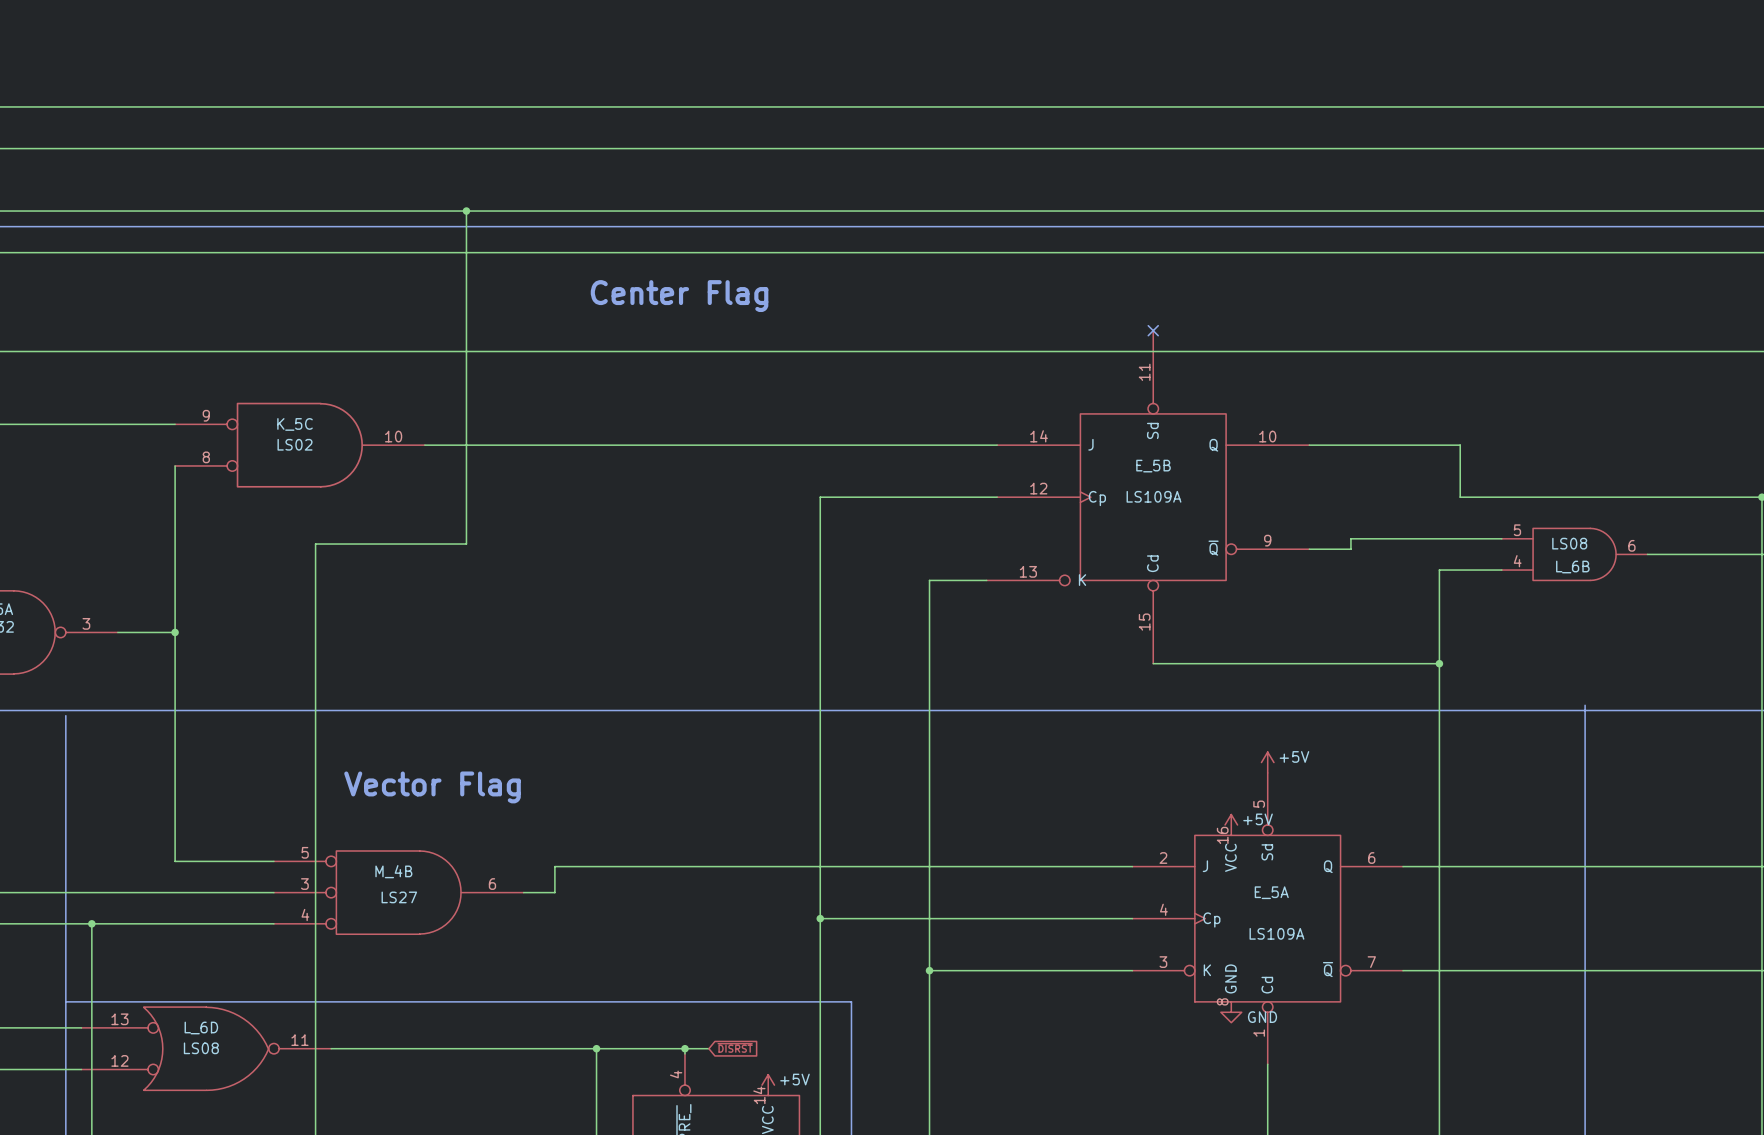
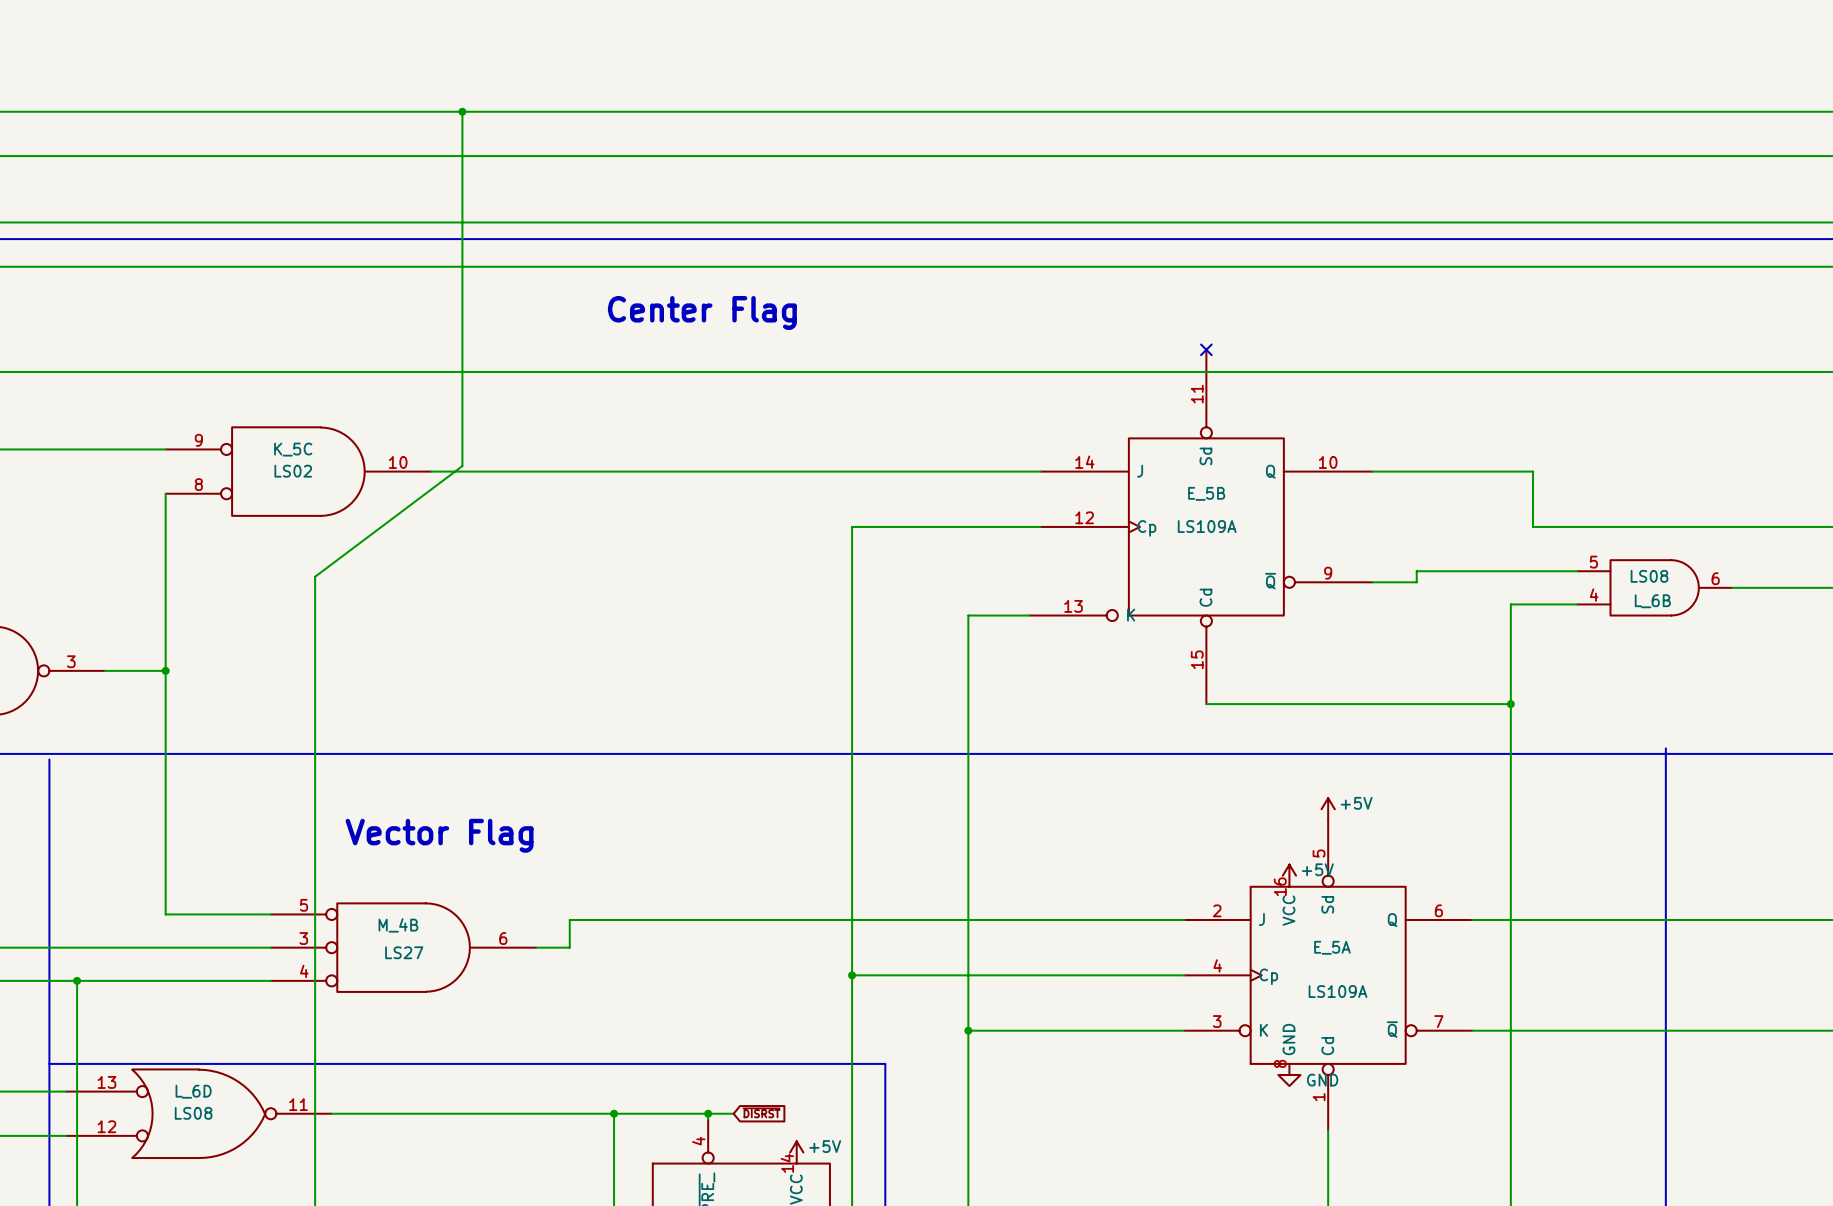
junction: none -> (462, 111)
wire: (466, 211) (466, 544) (315, 544) -> (462, 111) (462, 466) (315, 576)
junction: (466, 211) -> none

